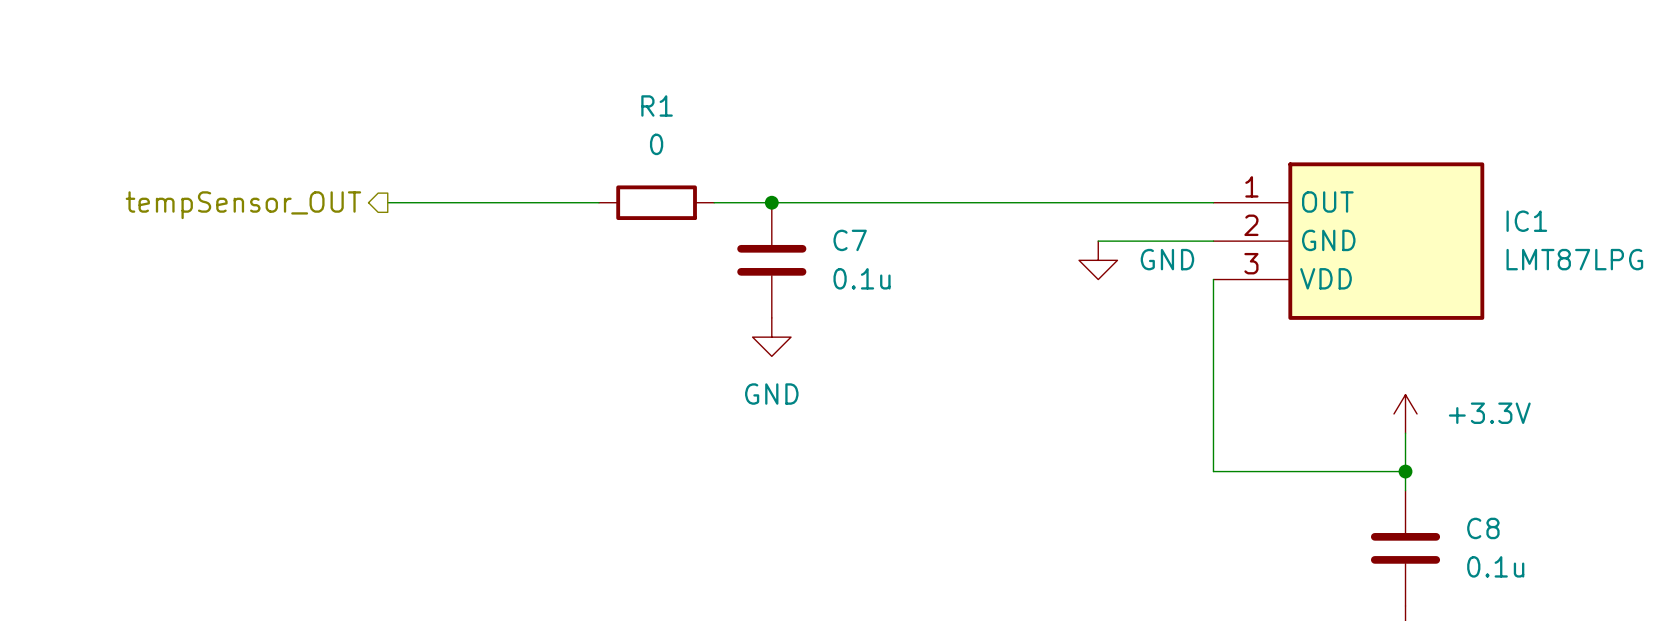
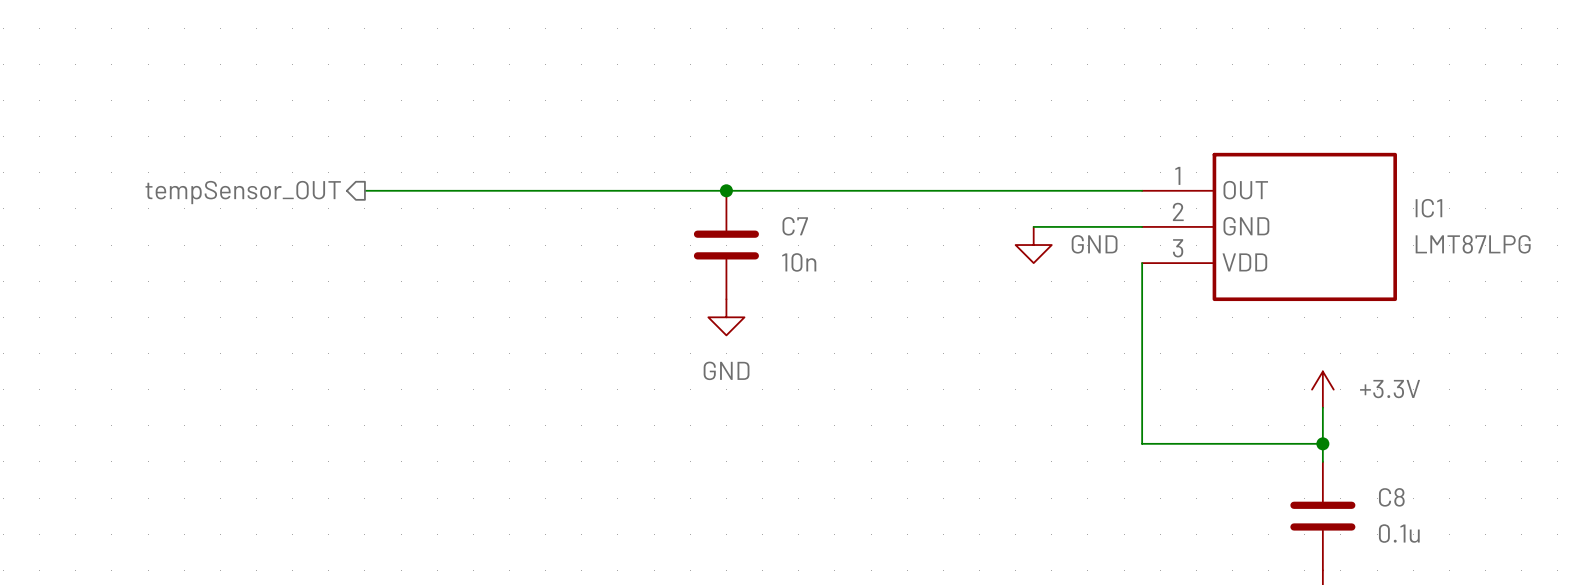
wire: none -> (563, 190) (672, 190)
R1: 0 (656, 202) -> none
C7 value: 0.1u (862, 278) -> 10n (799, 262)

